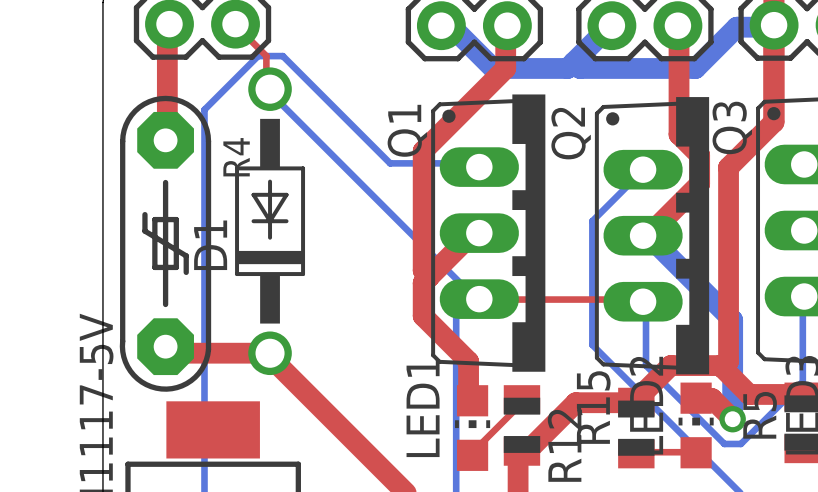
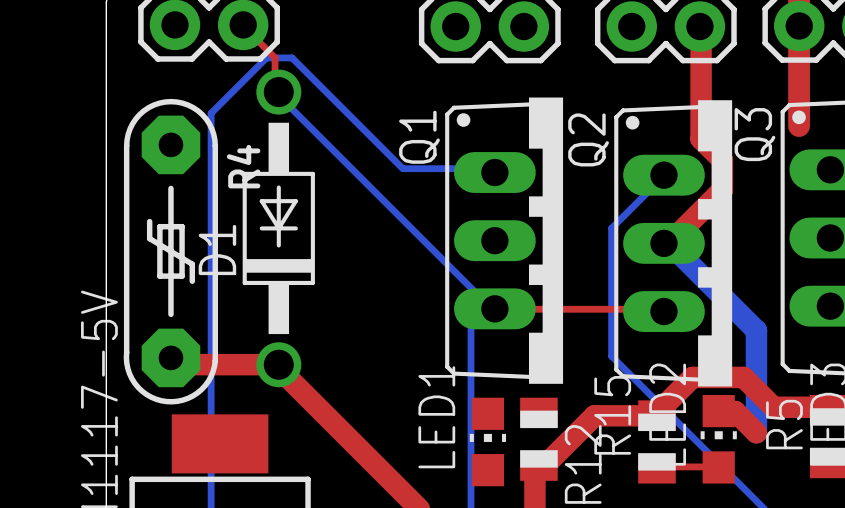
top track: (169, 24) (167, 27) (167, 138) (165, 140) -> none
bottom track: (441, 25) (452, 27) (493, 68) (567, 68) (611, 25) -> none
top track: (507, 25) (505, 27) (505, 68) (423, 151) (423, 270) (429, 276) -> none
top track: (774, 25) (773, 122) (728, 167) (728, 361) (722, 367) -> none
bottom track: (774, 25) (773, 27) (736, 27) (695, 68) (579, 68) (573, 62) -> none
top track: (479, 233) (476, 229) (423, 283) (423, 316) (468, 361) (468, 398) (472, 400) -> none
bottom track: (804, 296) (802, 382) (740, 443) (724, 443) (646, 365) (646, 303) (643, 301) -> none
top track: (521, 399) (522, 402) (472, 452) (472, 455) -> none
via: (732, 419) -> none

